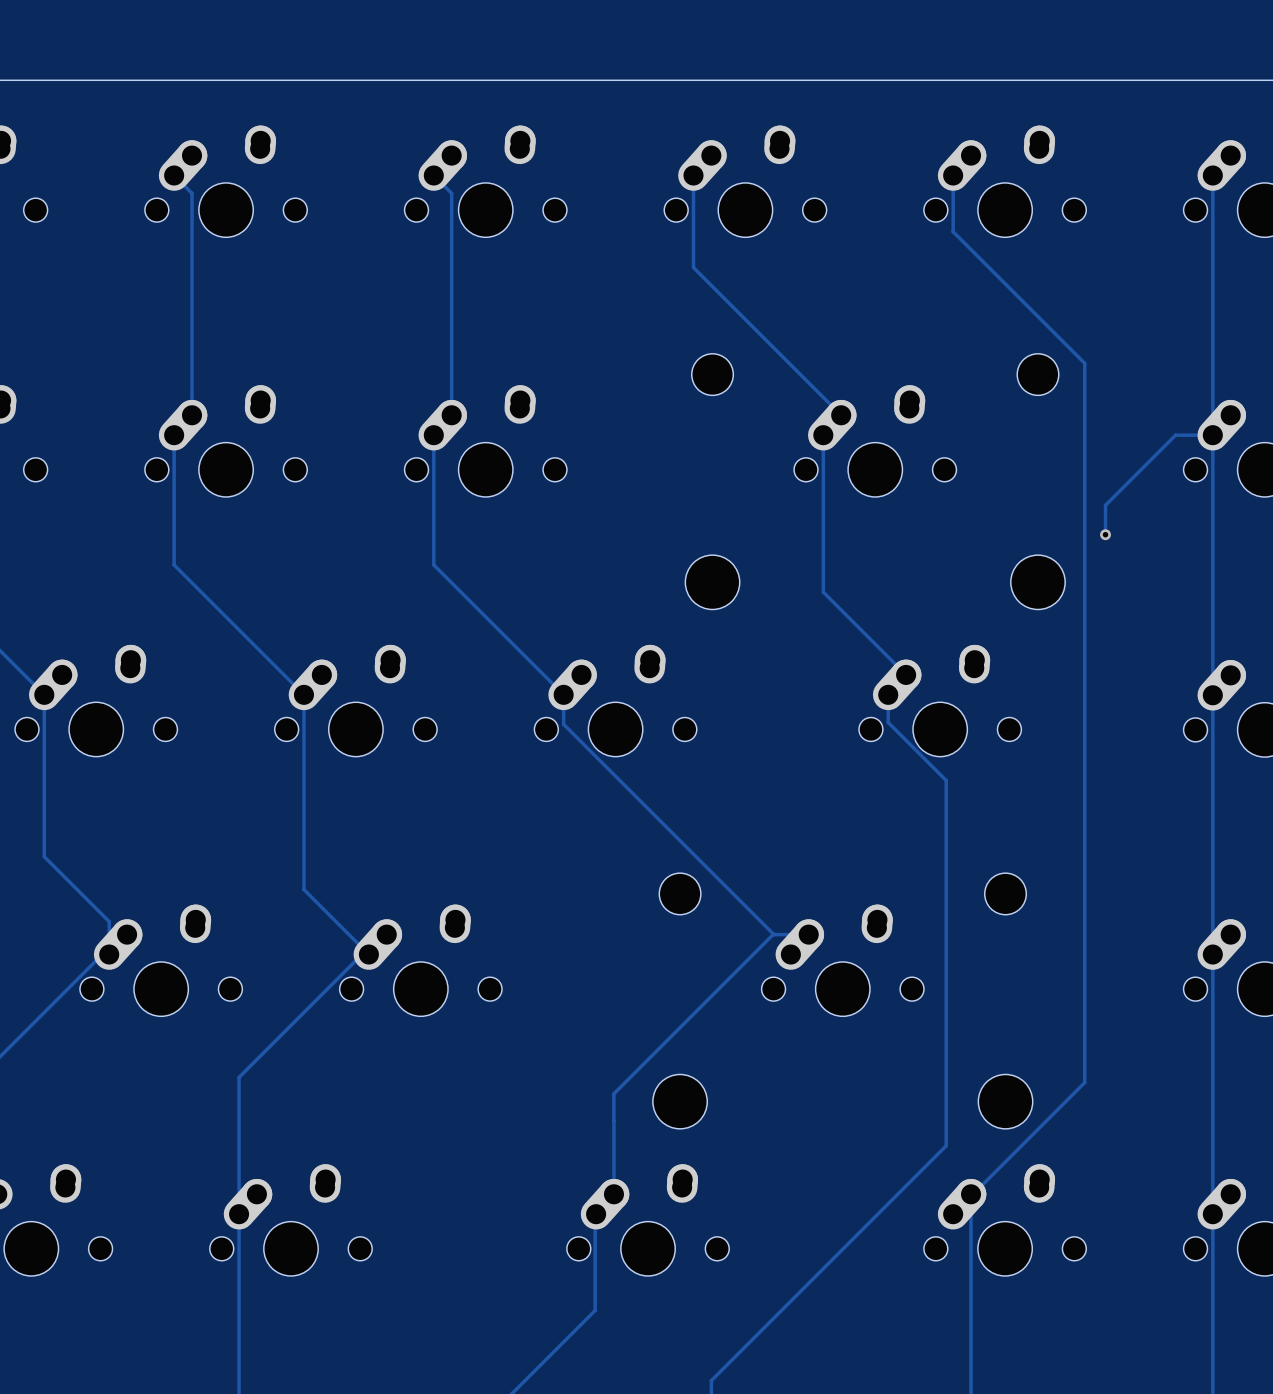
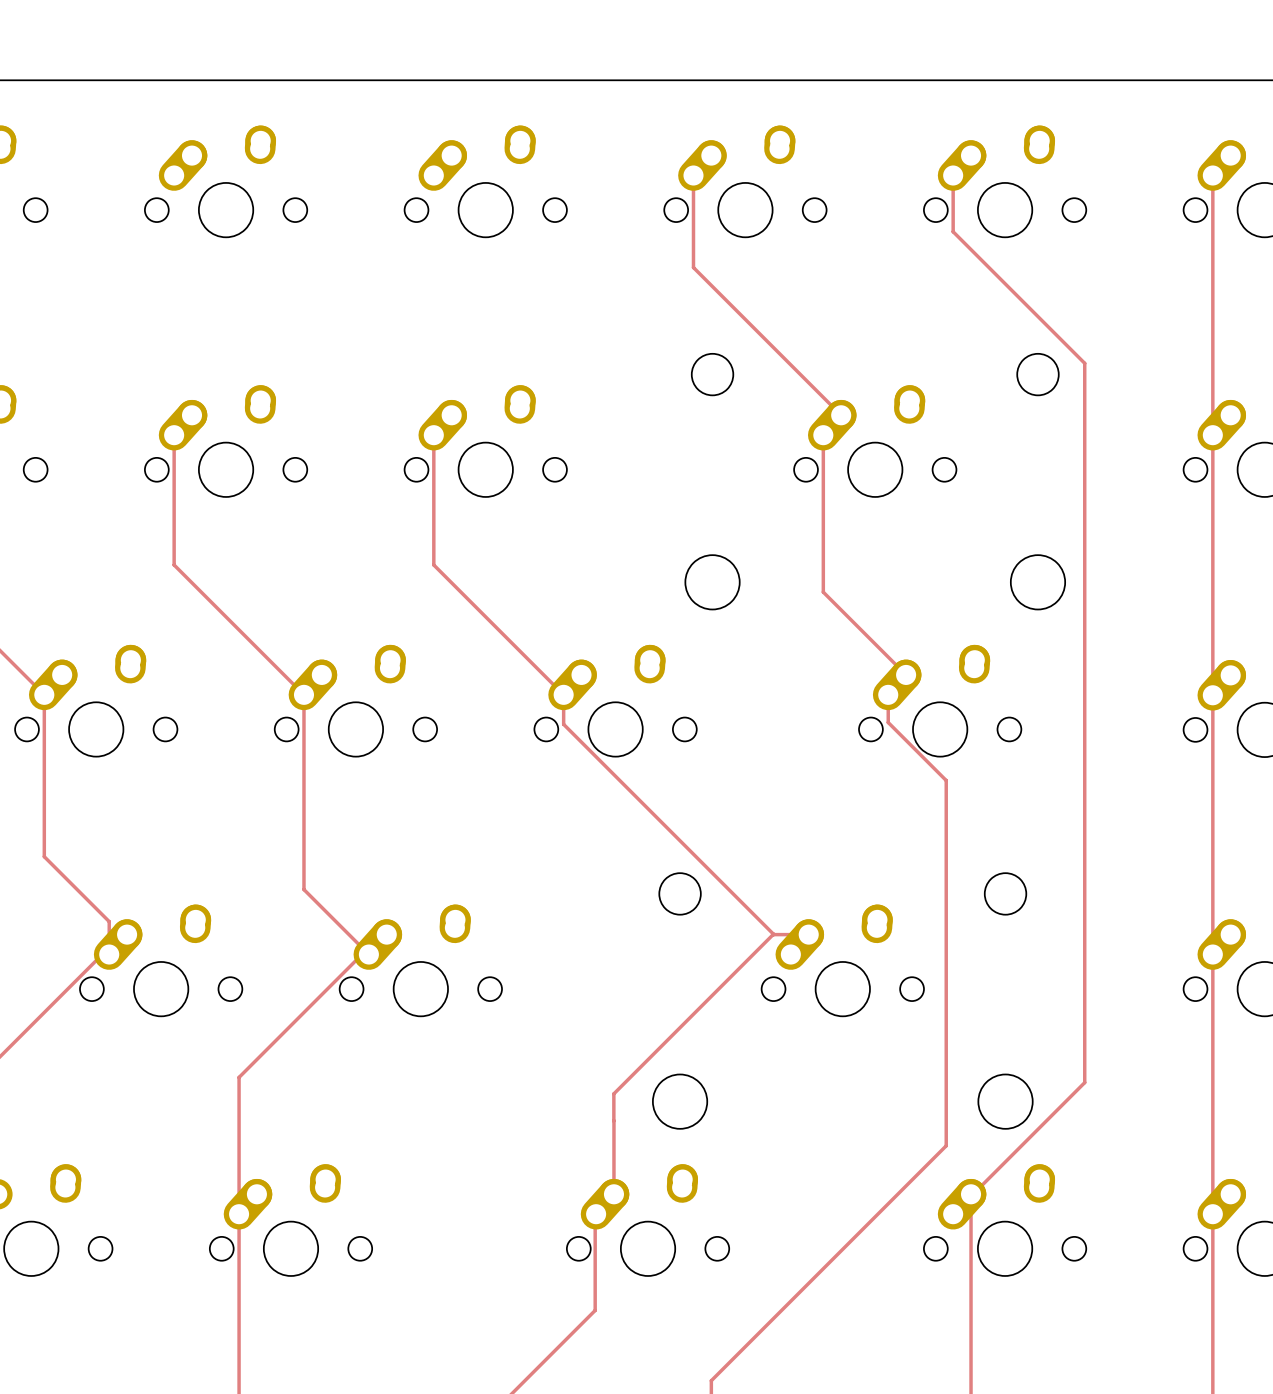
track: (174, 175) (192, 193) (192, 415) -> none
track: (433, 175) (451, 193) (451, 415) -> none
track: (1212, 435) (1175, 435) (1105, 505) (1105, 534) -> none
via: (1105, 534) -> none

